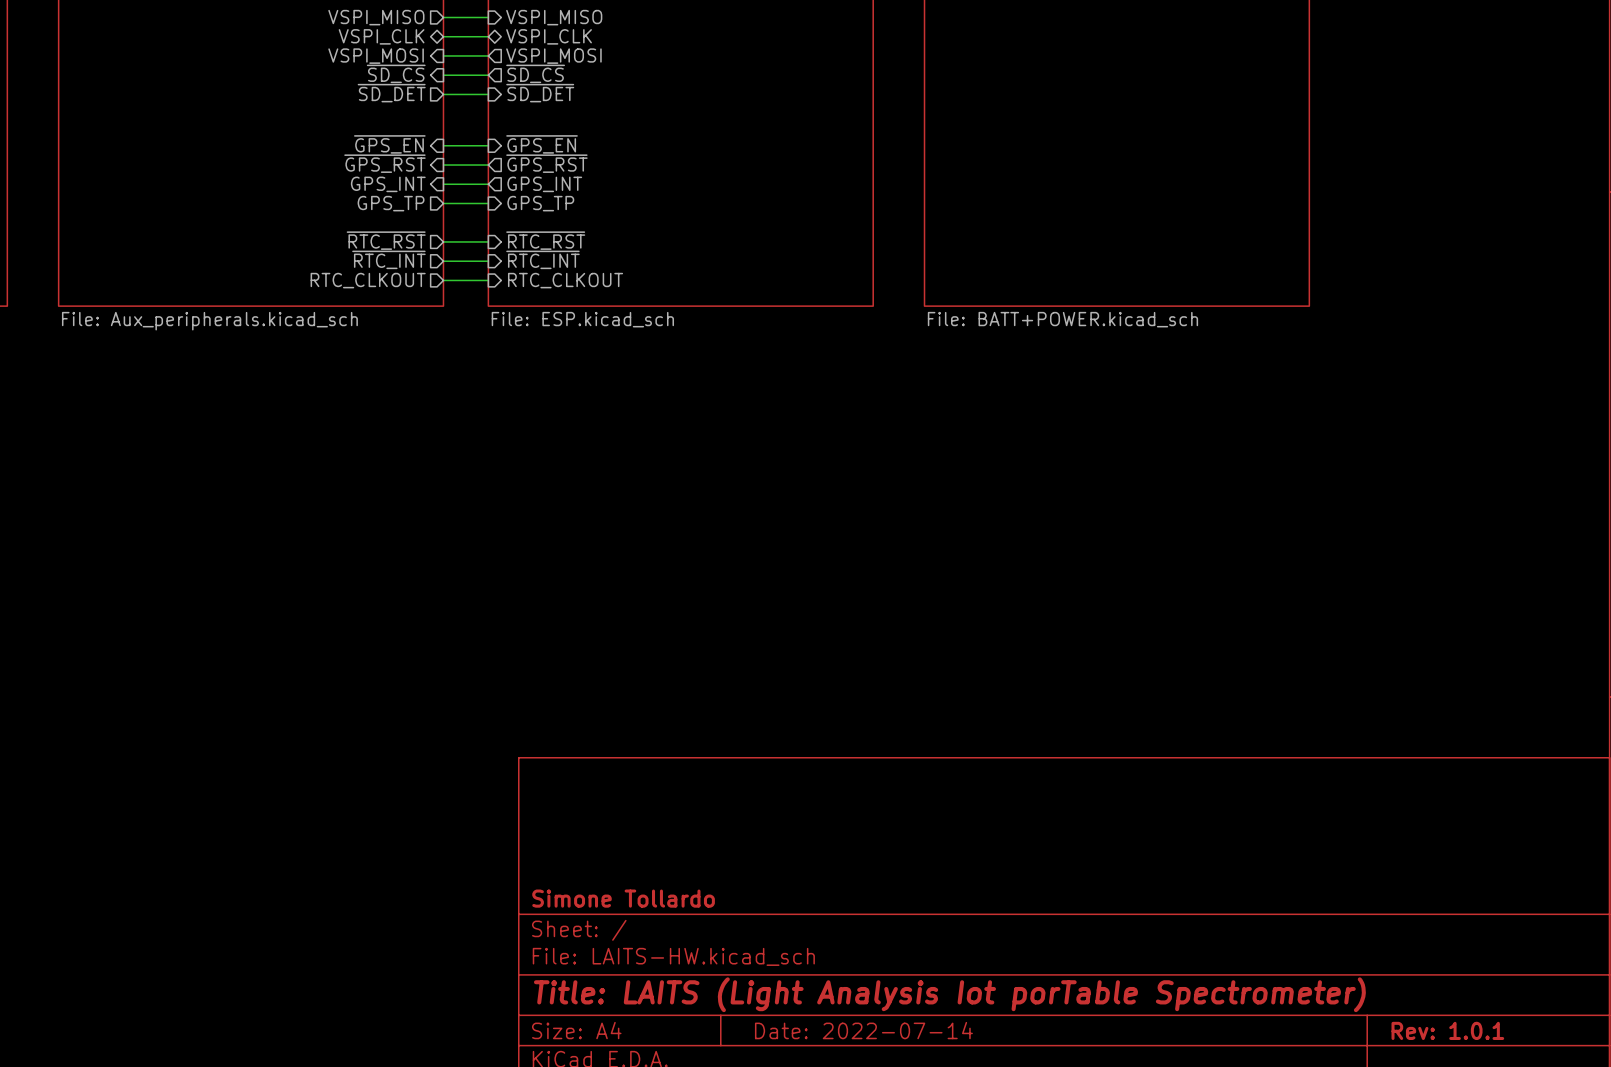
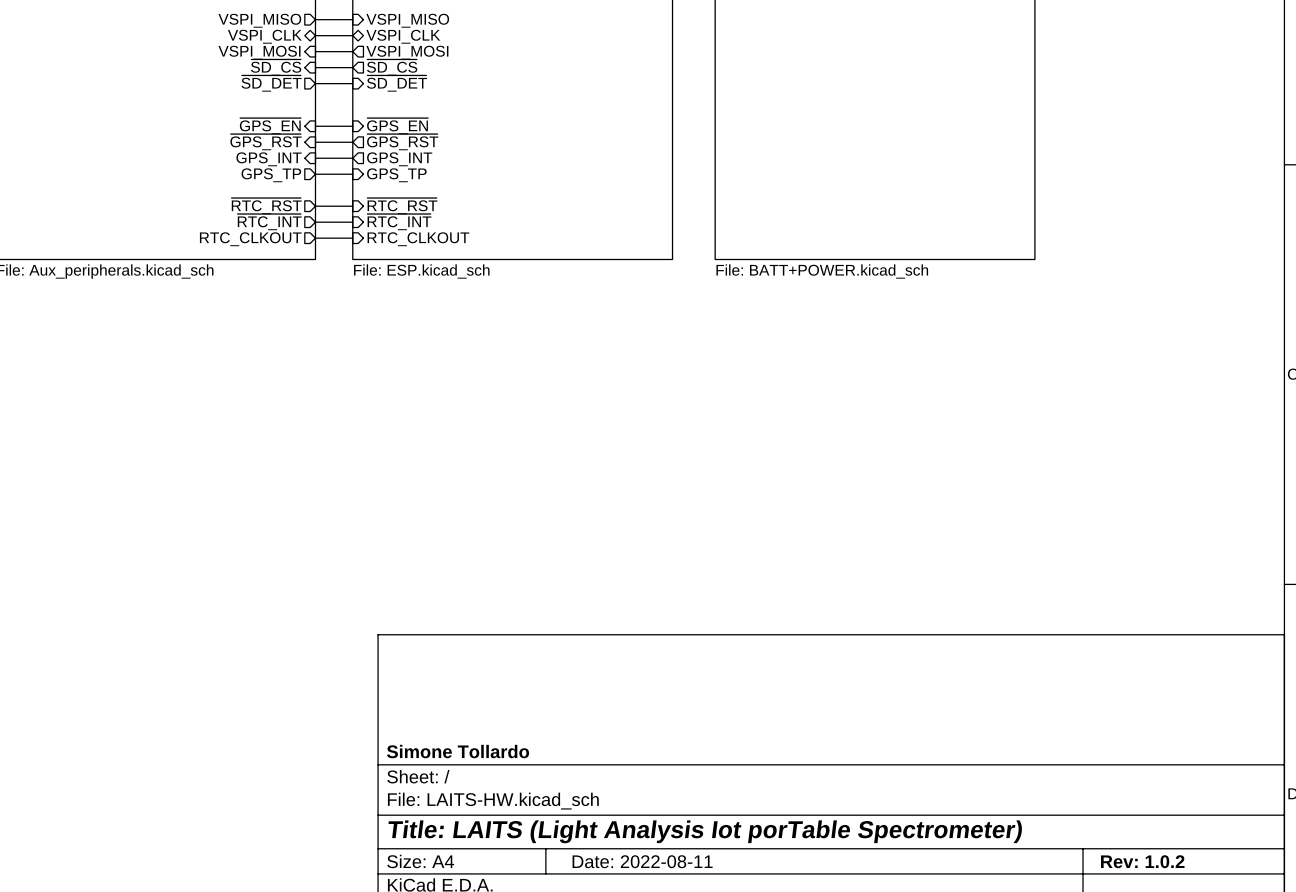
title block: Date: 2022-07-14 (863, 1030) -> Date: 2022-08-11 (642, 861)
title block: Rev: 1.0.1 (1447, 1030) -> Rev: 1.0.2 (1142, 861)

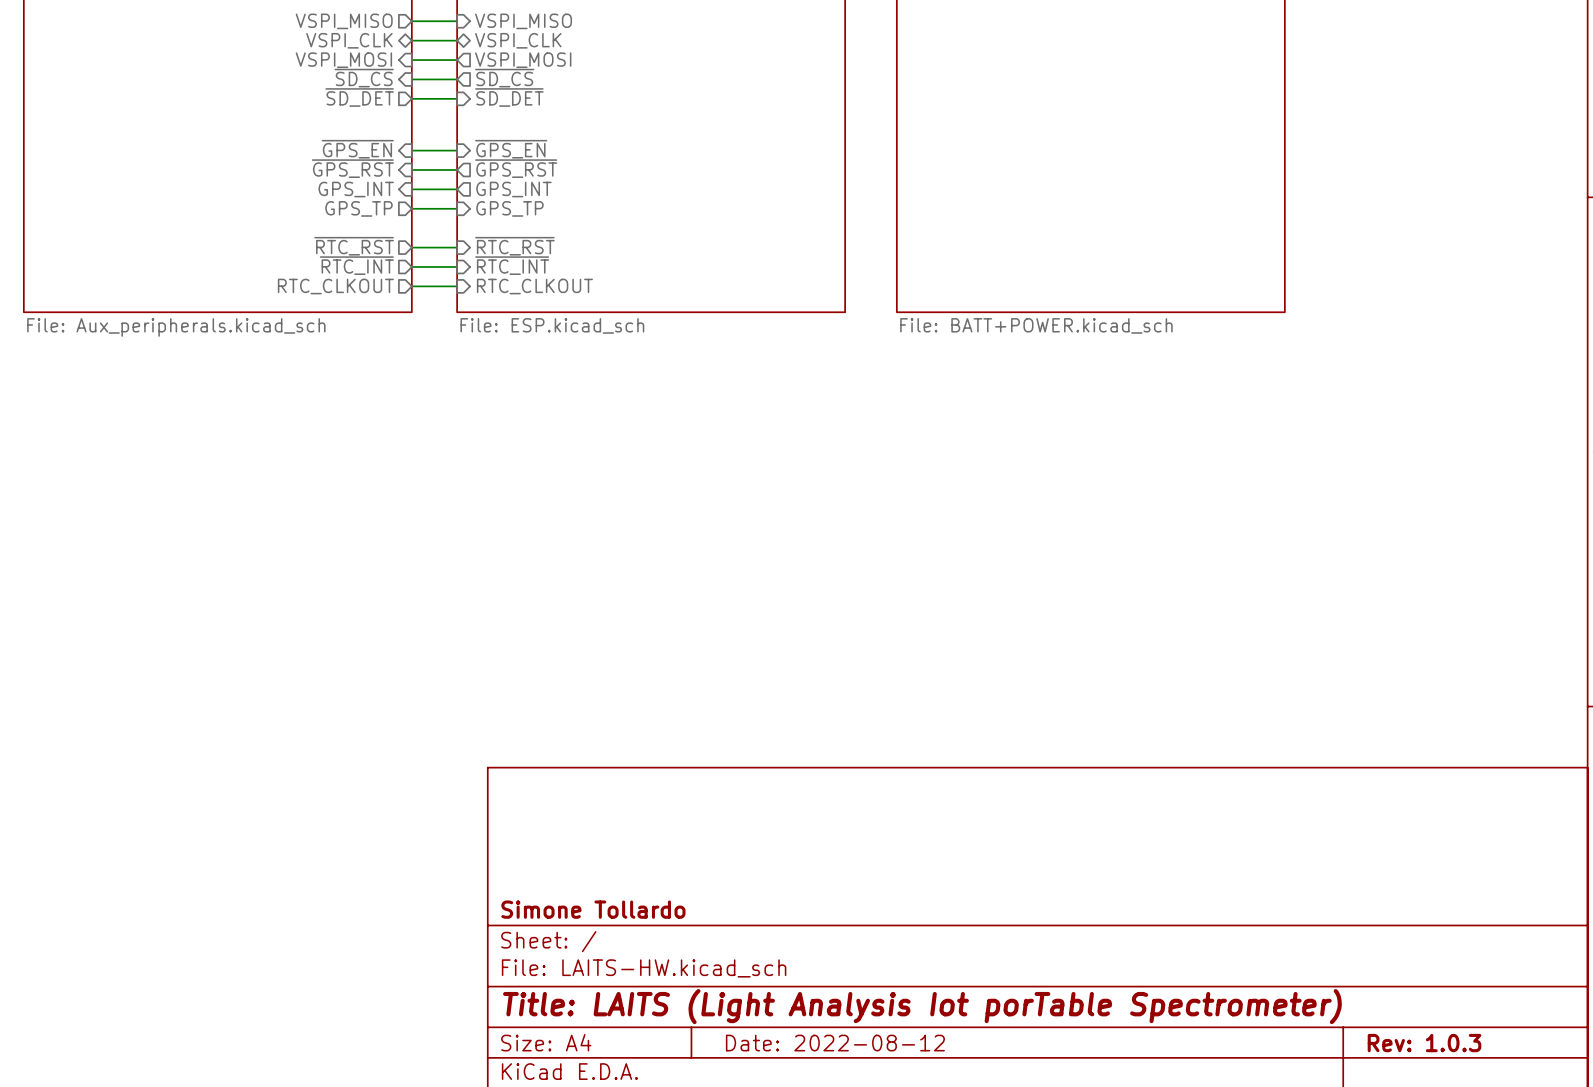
title block: Date: 2022-08-11 (642, 861) -> Date: 2022-08-12 (835, 1043)
title block: Rev: 1.0.2 (1142, 861) -> Rev: 1.0.3 (1424, 1043)

